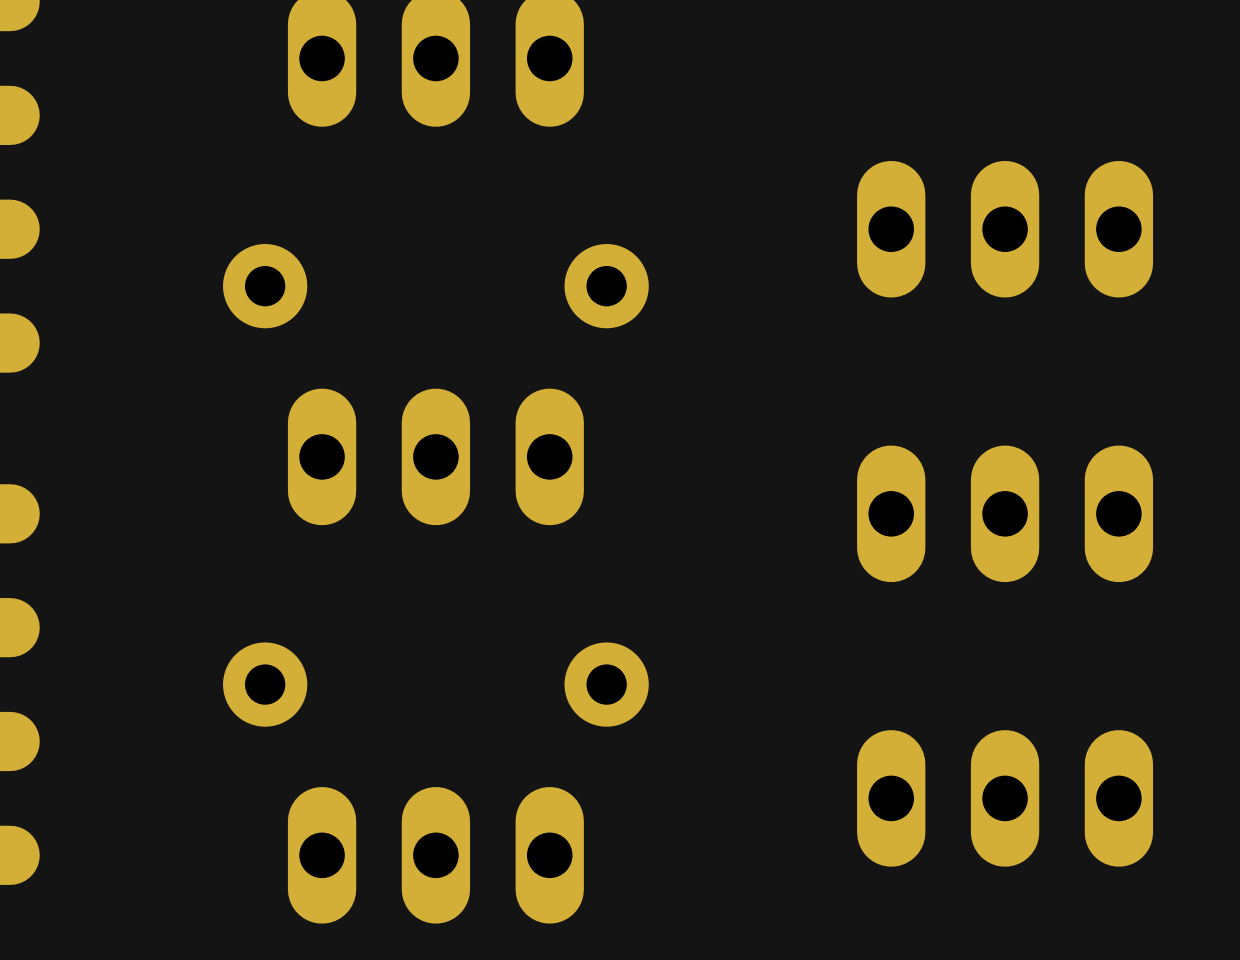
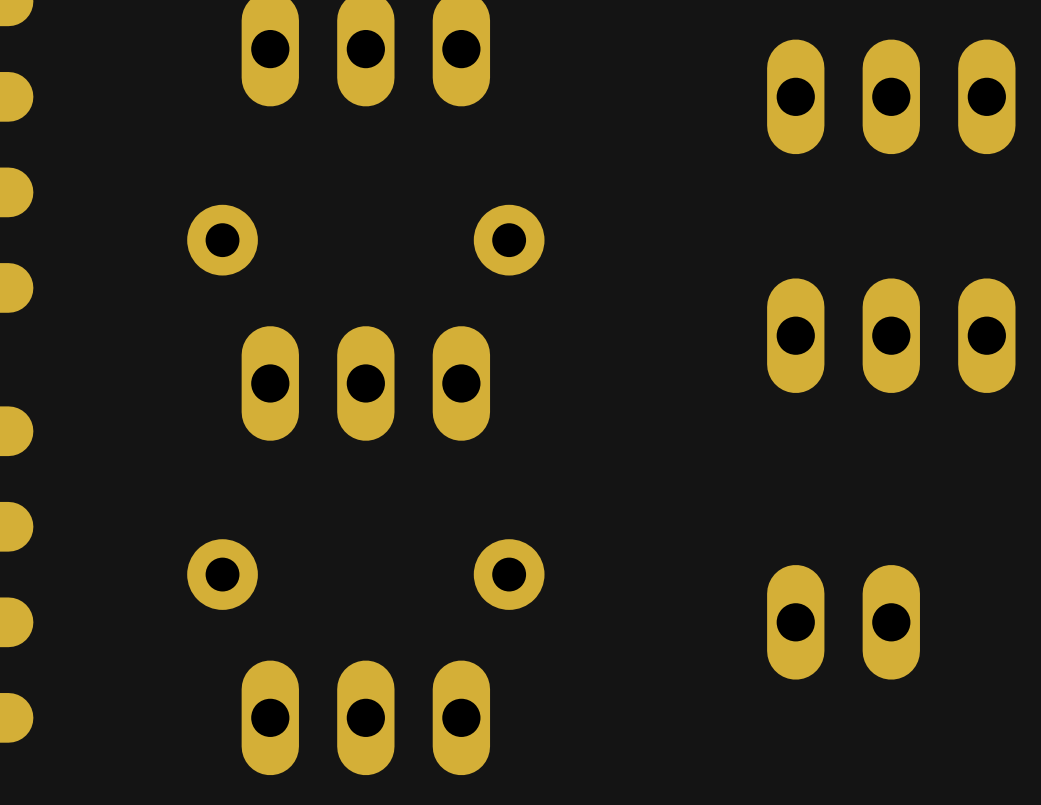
part: none -> (891, 96)
part: (1005, 229) -> none
part: none -> (891, 335)
part: (1005, 513) -> none
part: none -> (843, 622)
part: (1005, 798) -> none

